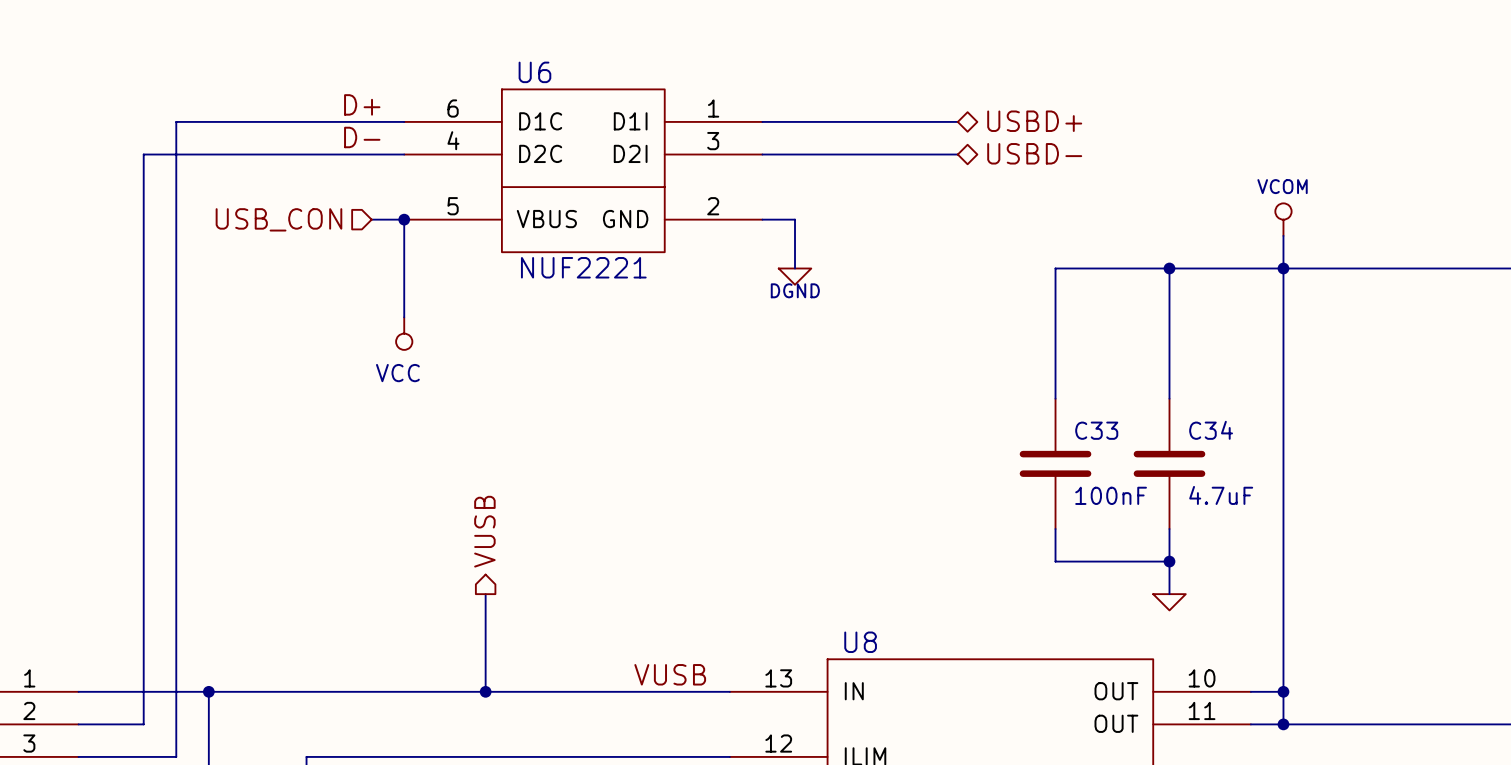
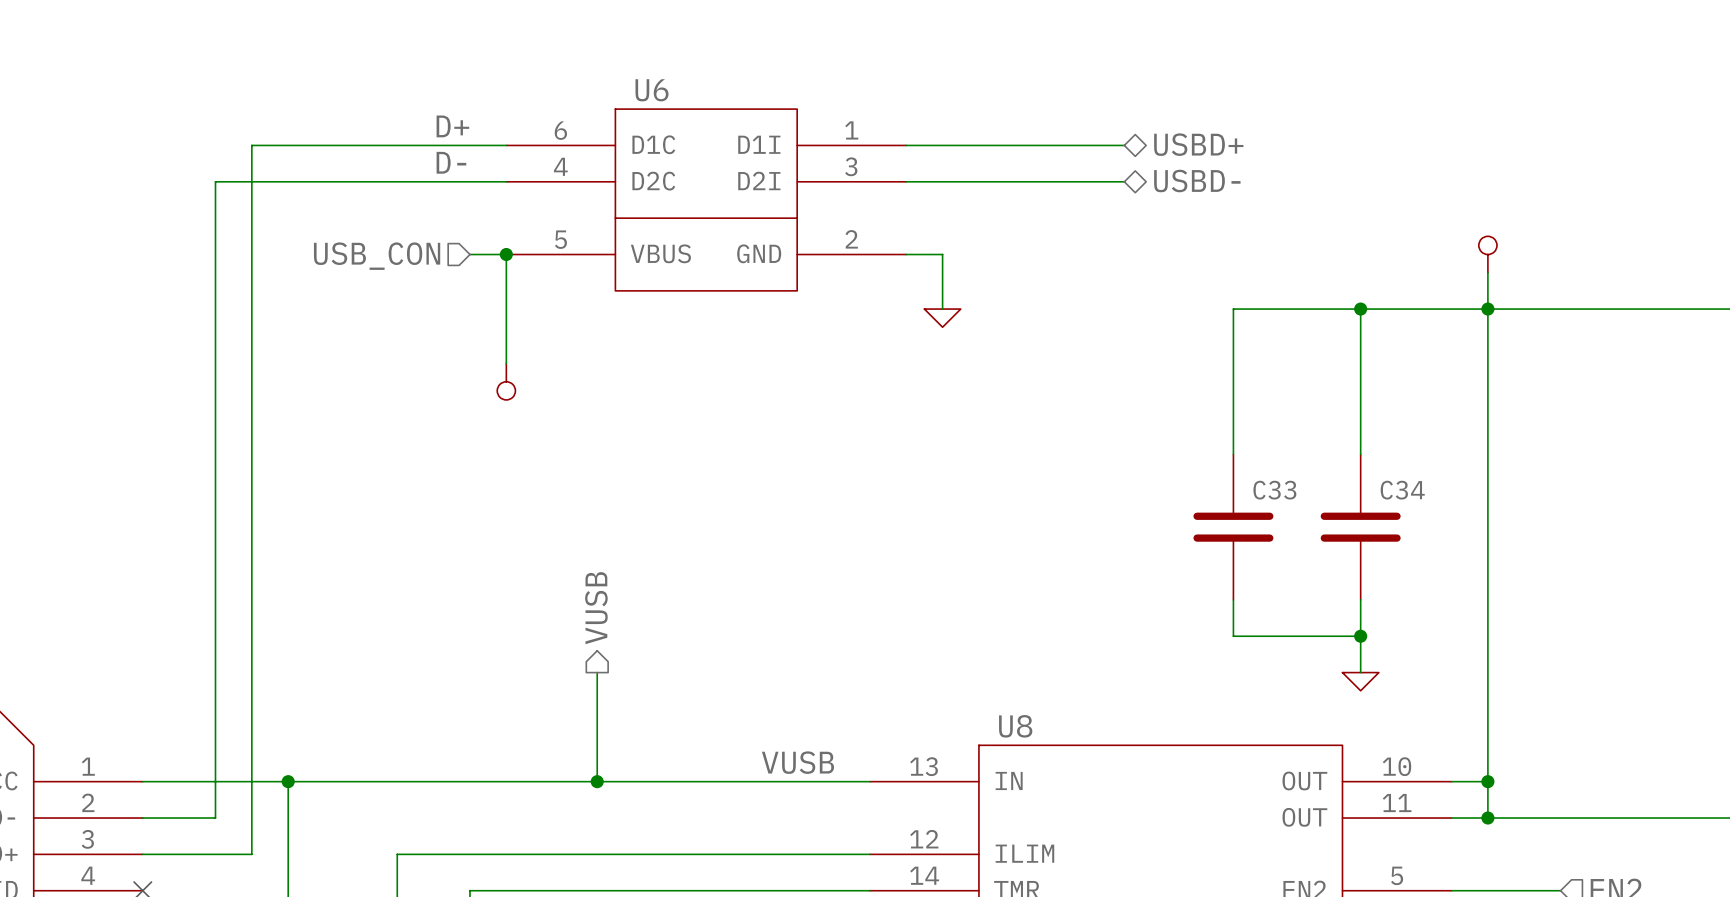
power symbol text: VCOM (1282, 186) -> none
U6 value: NUF2221 (583, 267) -> none
power symbol text: DGND (795, 290) -> none
power symbol text: VCC (397, 373) -> none
C33 value: 100nF (1111, 495) -> none
C34 value: 4.7uF (1221, 495) -> none

